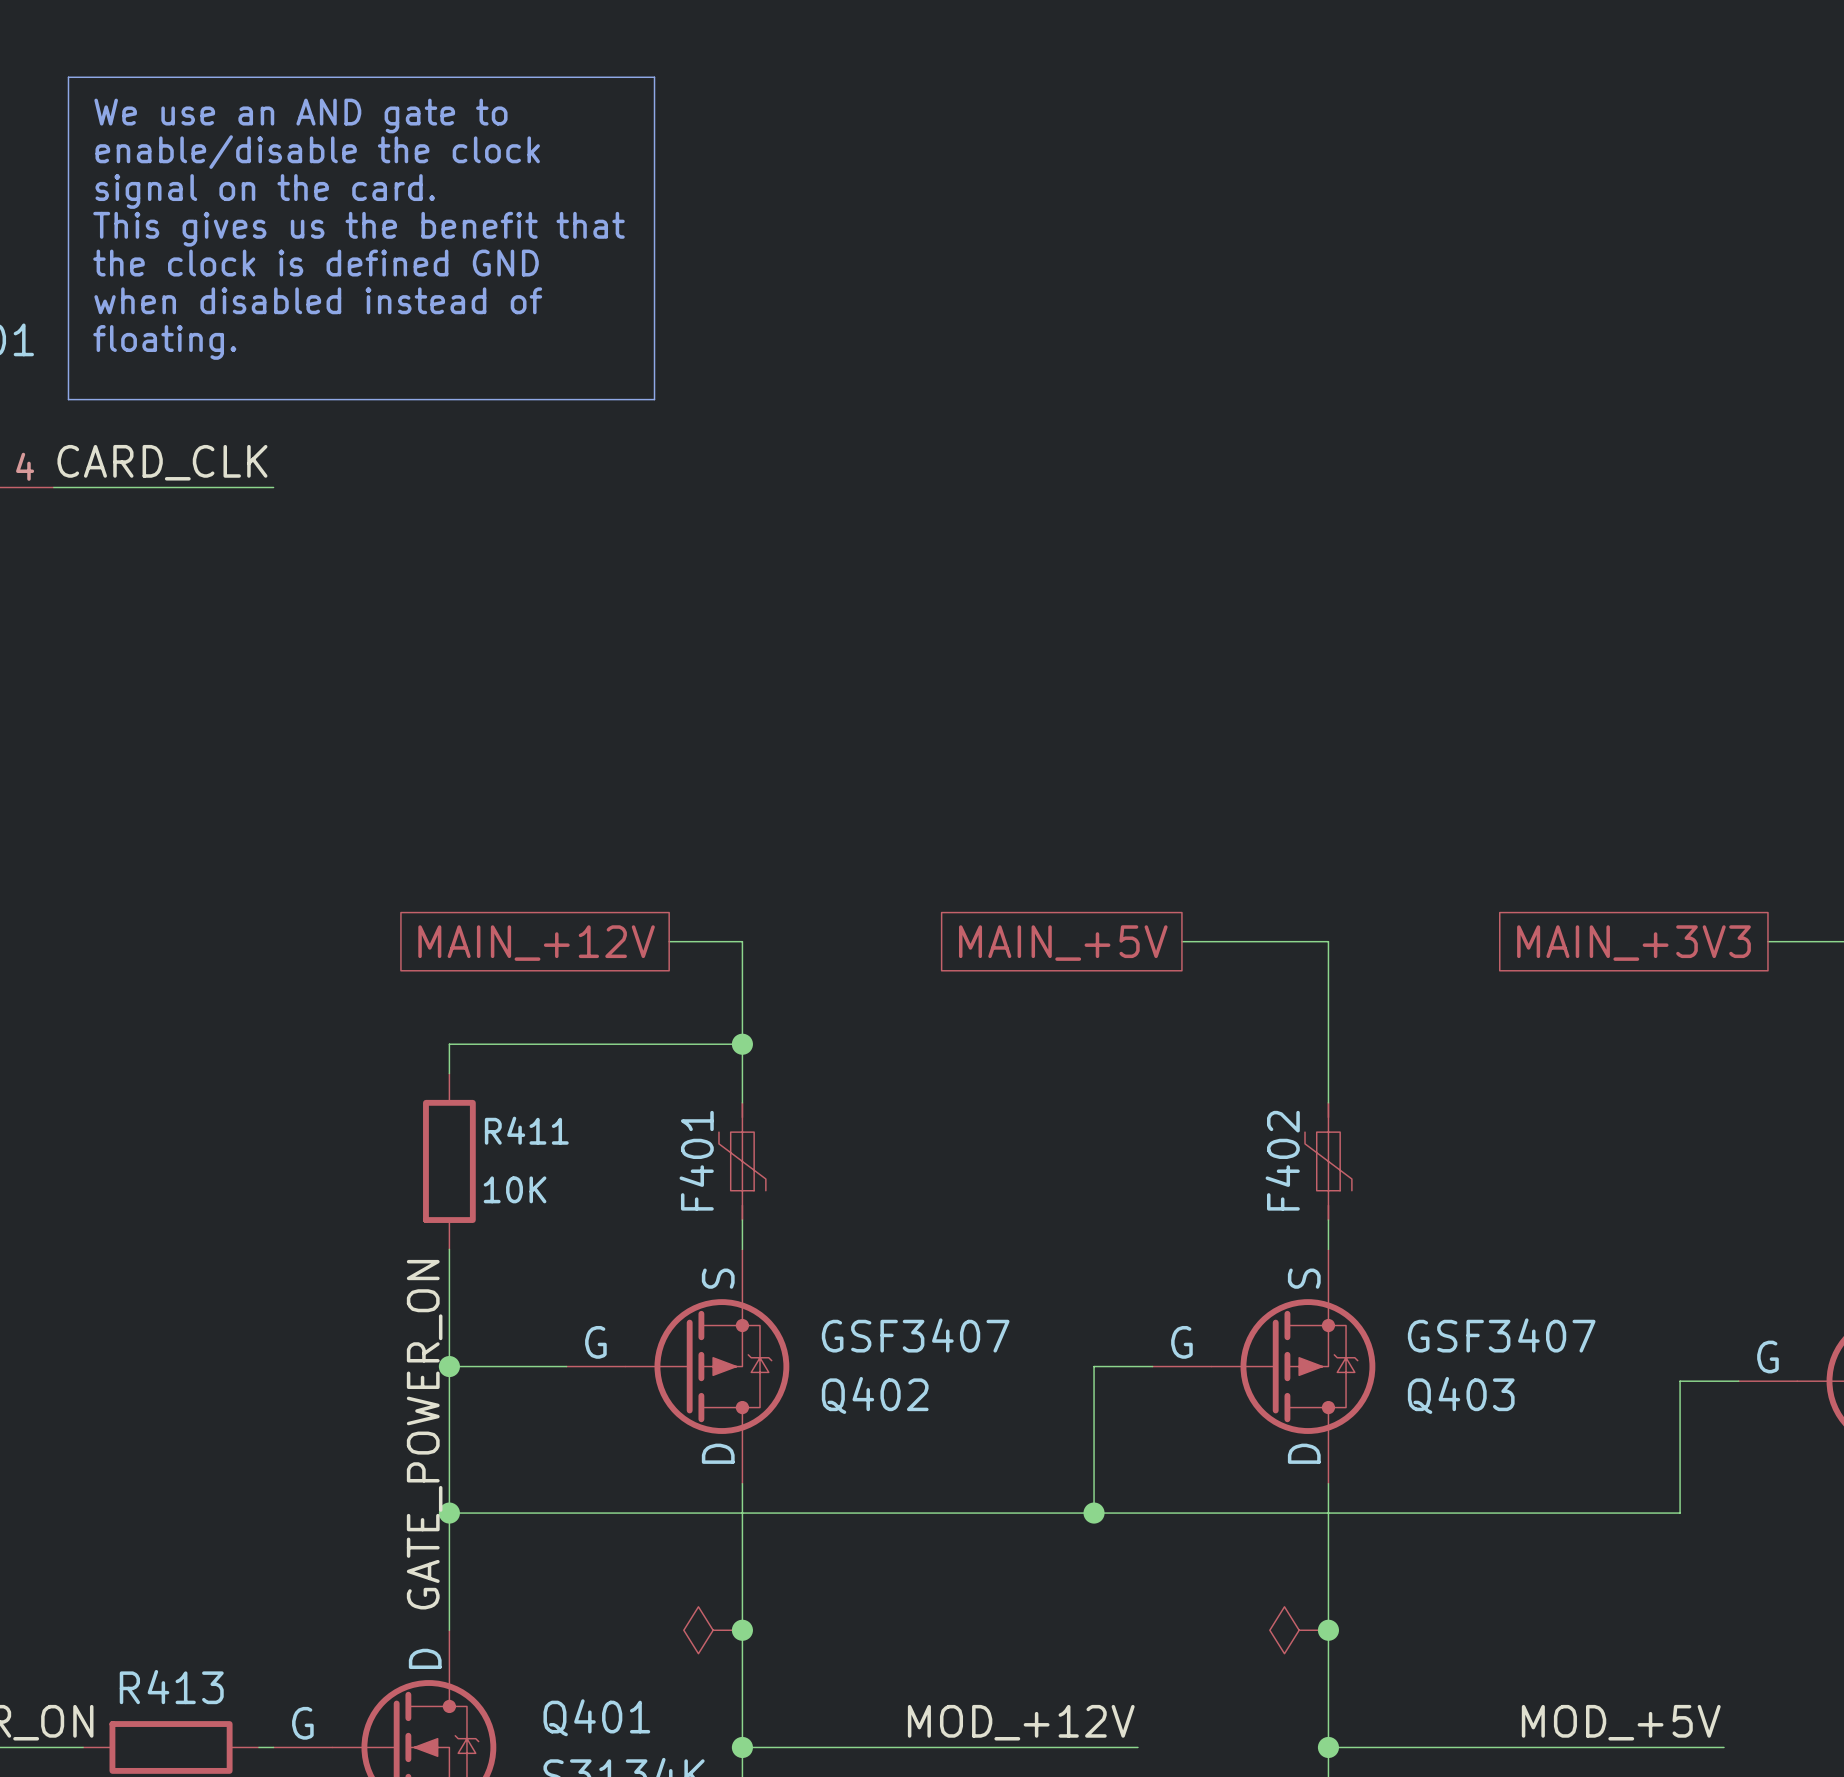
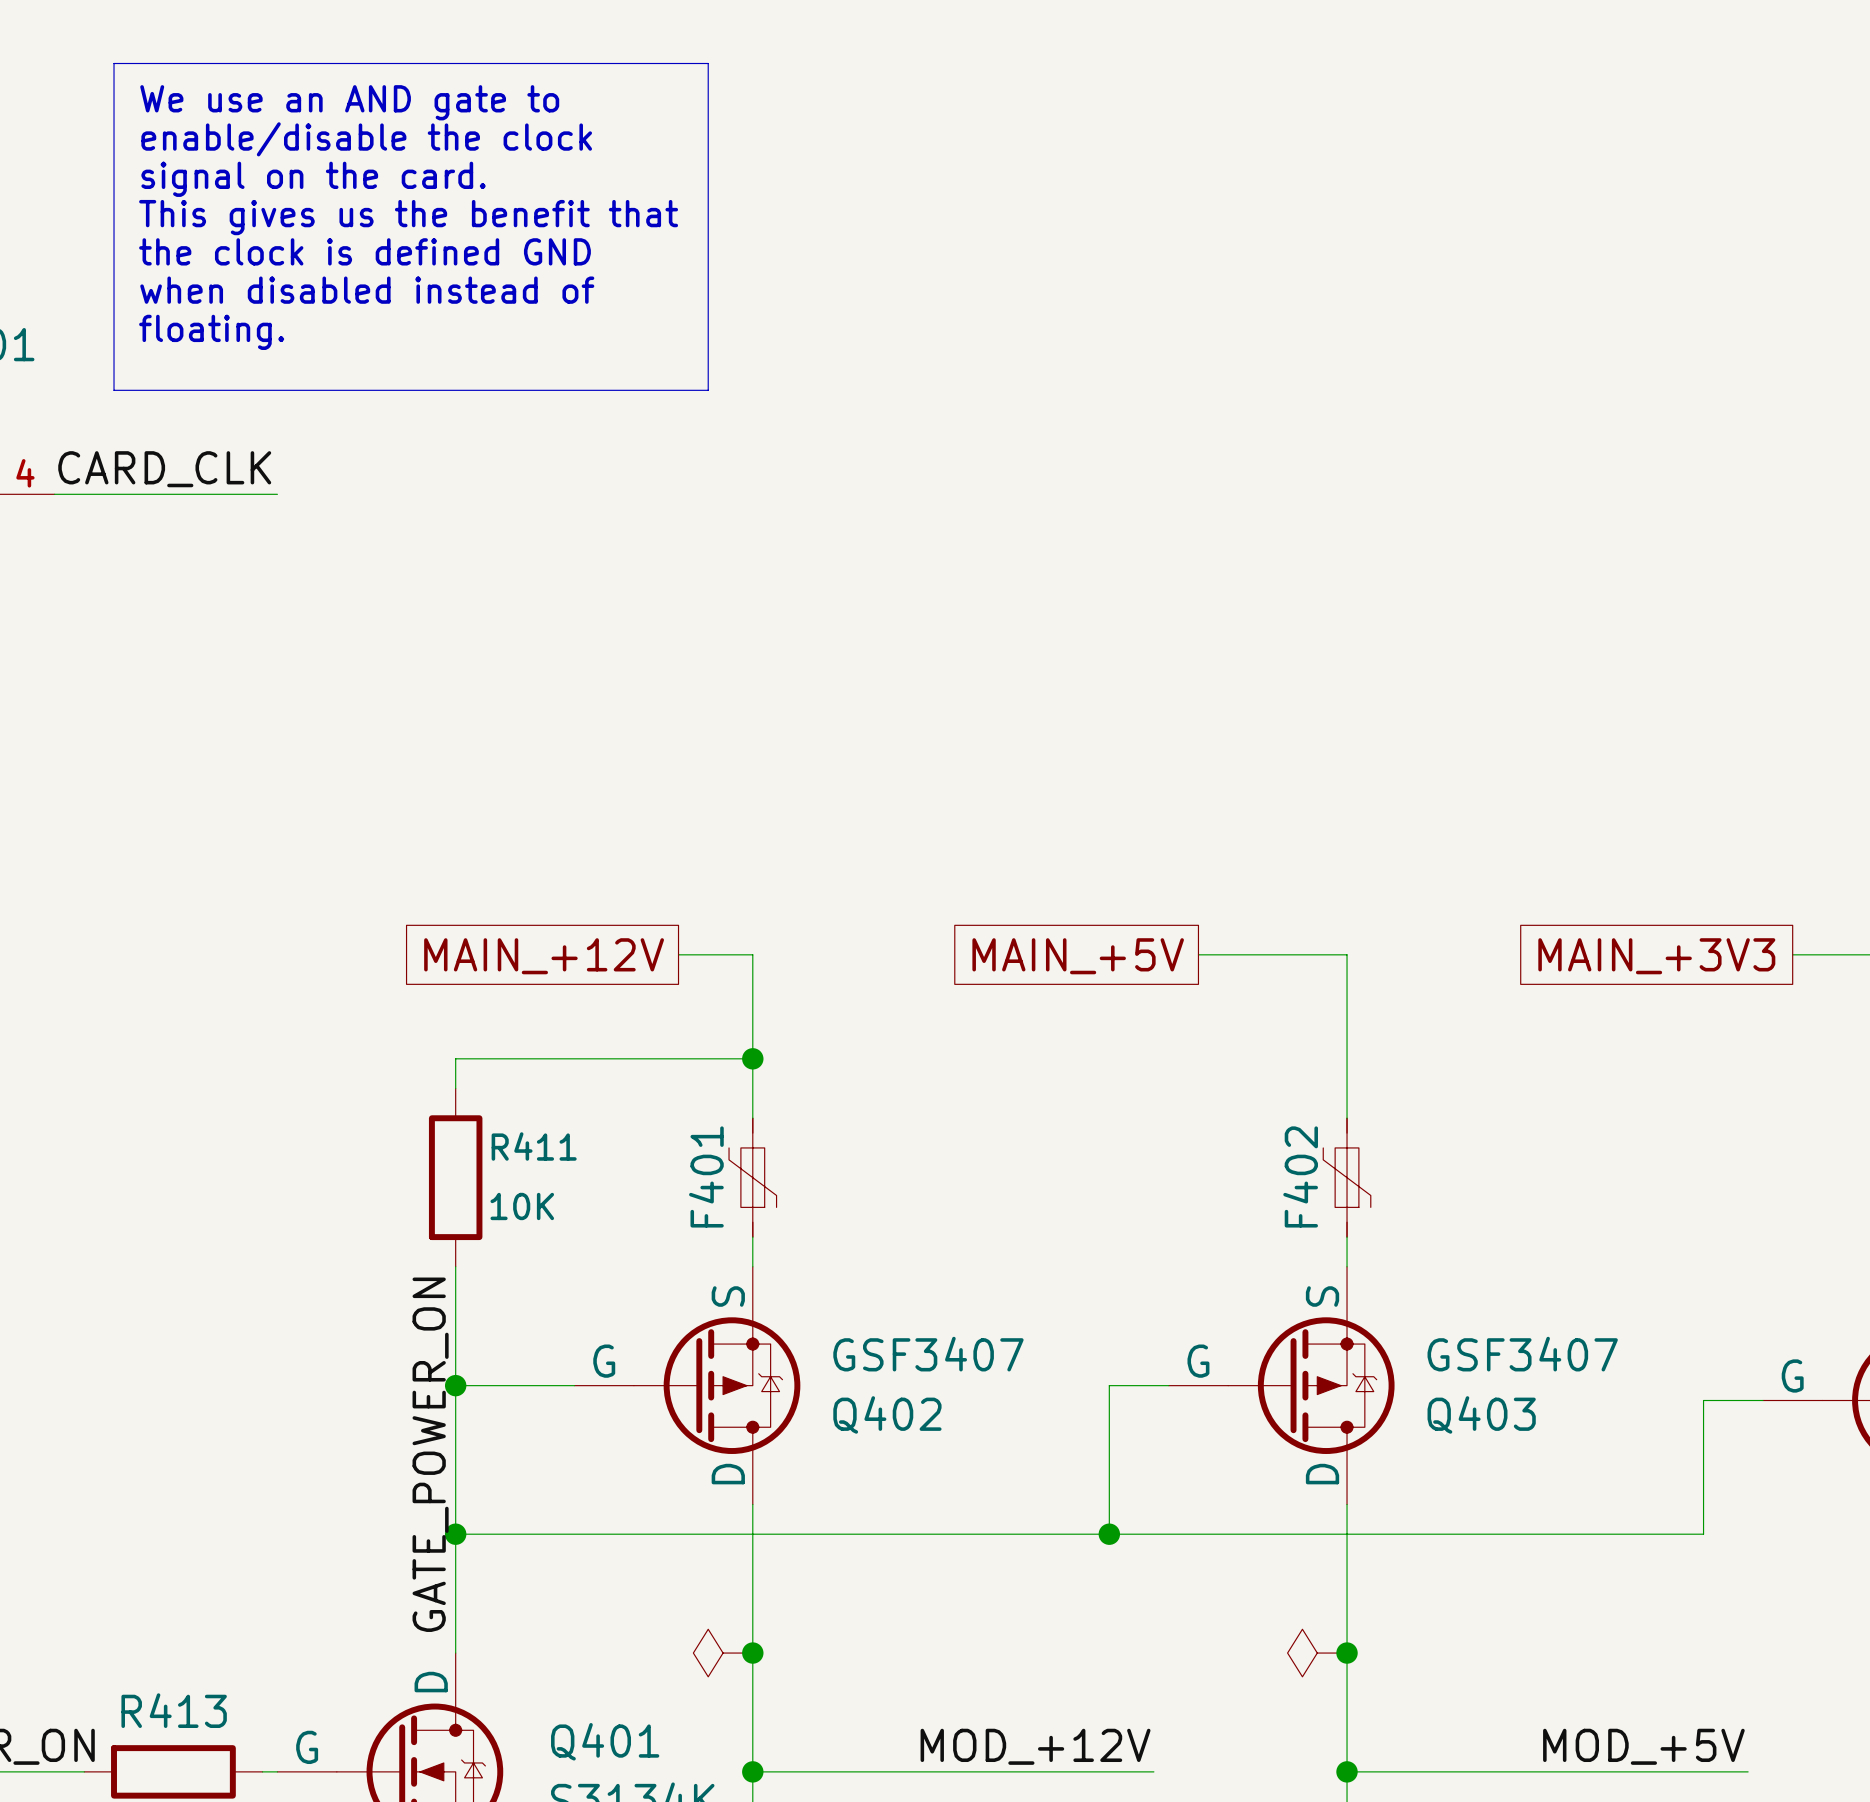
line: (68, 77) (654, 77) (654, 399) (68, 399) (68, 77) -> (114, 63) (114, 390) (708, 390) (708, 63) (114, 63)
text position: We use an AND gate to (300, 115) -> We use an AND gate to (349, 102)
text position: enable/disable the clock (317, 152) -> enable/disable the clock (366, 139)
text position: signal on the card. (265, 191) -> signal on the card. (313, 179)
text position: This gives us the benefit that (358, 229) -> This gives us the benefit that (408, 217)
text position: the clock is defined GND (316, 263) -> the clock is defined GND (365, 251)
text position: when disabled instead of (318, 300) -> when disabled instead of (367, 290)
text position: floating. (164, 342) -> floating. (211, 332)

